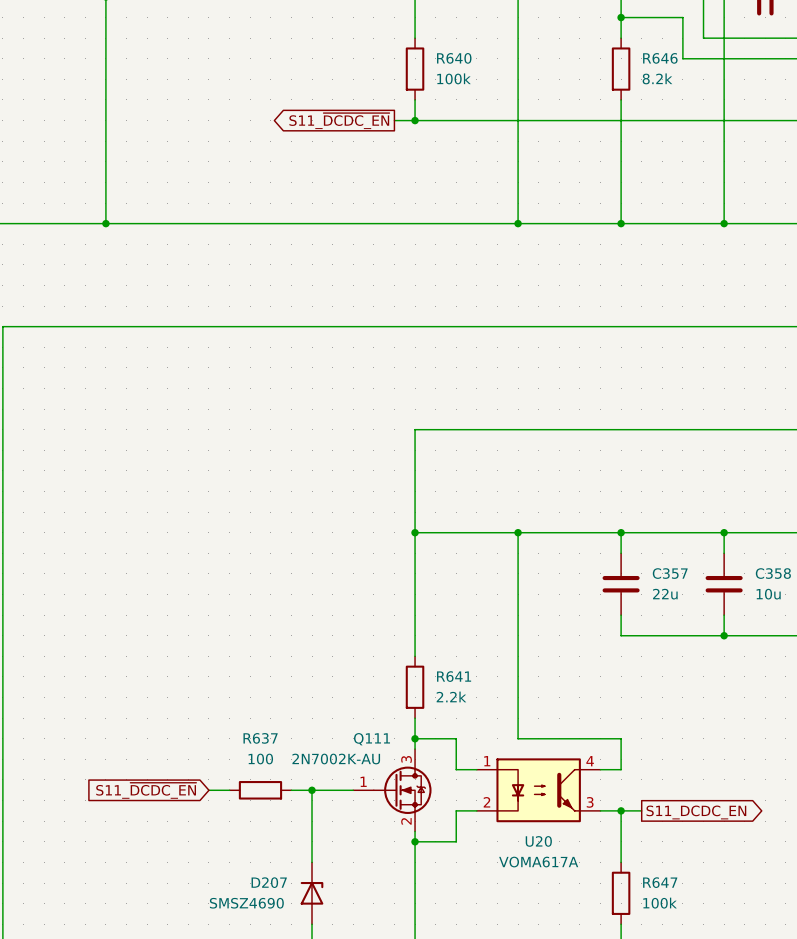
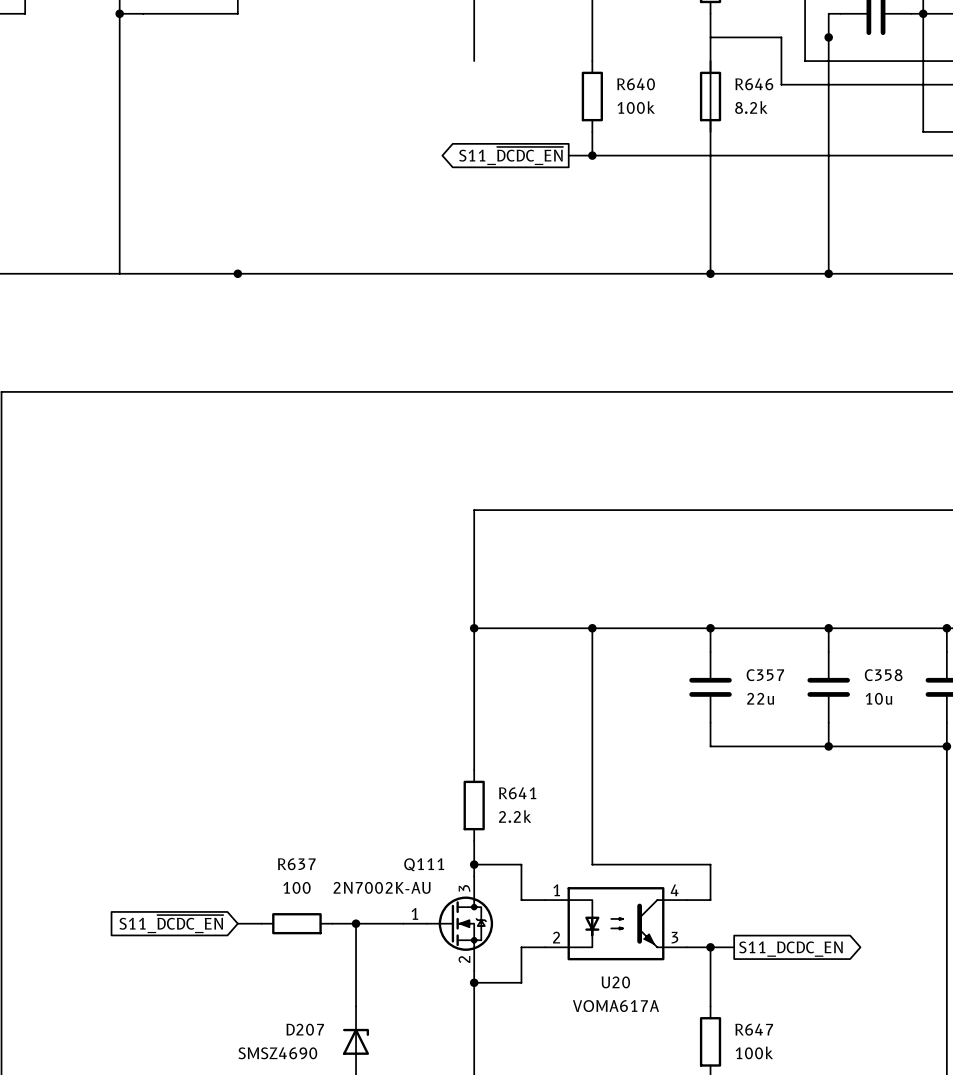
junction: (621, 17) -> none
junction: none -> (828, 37)
wire: (518, 38) (518, 99) -> (710, 61) (710, 131)
R640 position: (415, 69) -> (592, 96)
wire: (415, 99) (415, 120) -> none
wire: (394, 120) (497, 120) -> none
junction: (415, 120) -> none
wire: (518, 120) (518, 223) -> none
junction: none -> (592, 155)
global label position: S11_~{DCDC_EN} (339, 121) -> S11_~{DCDC_EN} (511, 156)
junction: (105, 223) -> none
junction: none -> (237, 273)
junction: (518, 223) -> none

